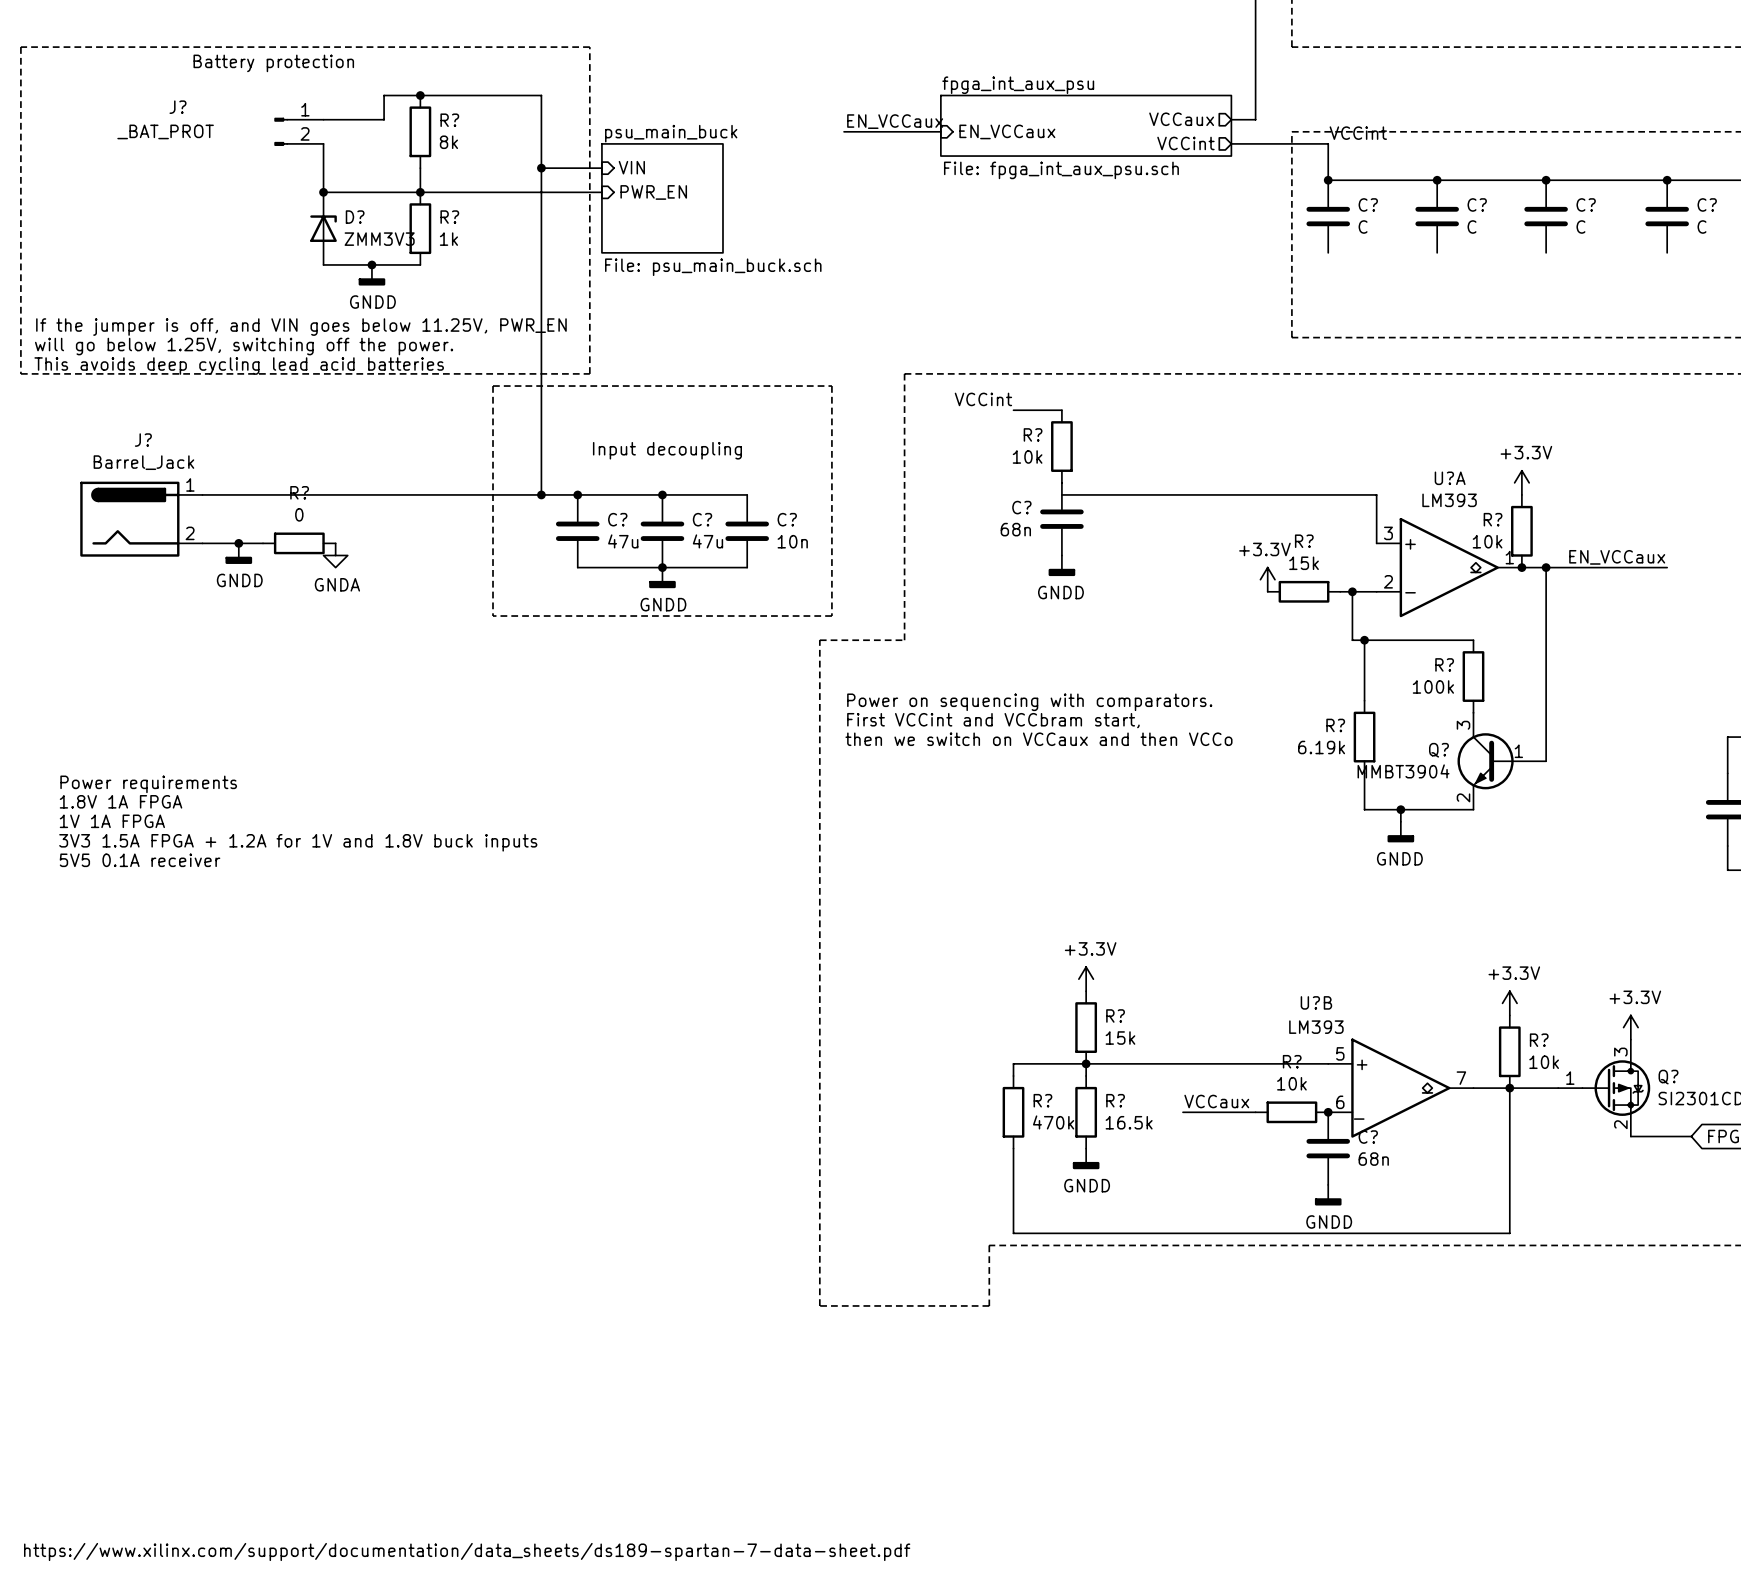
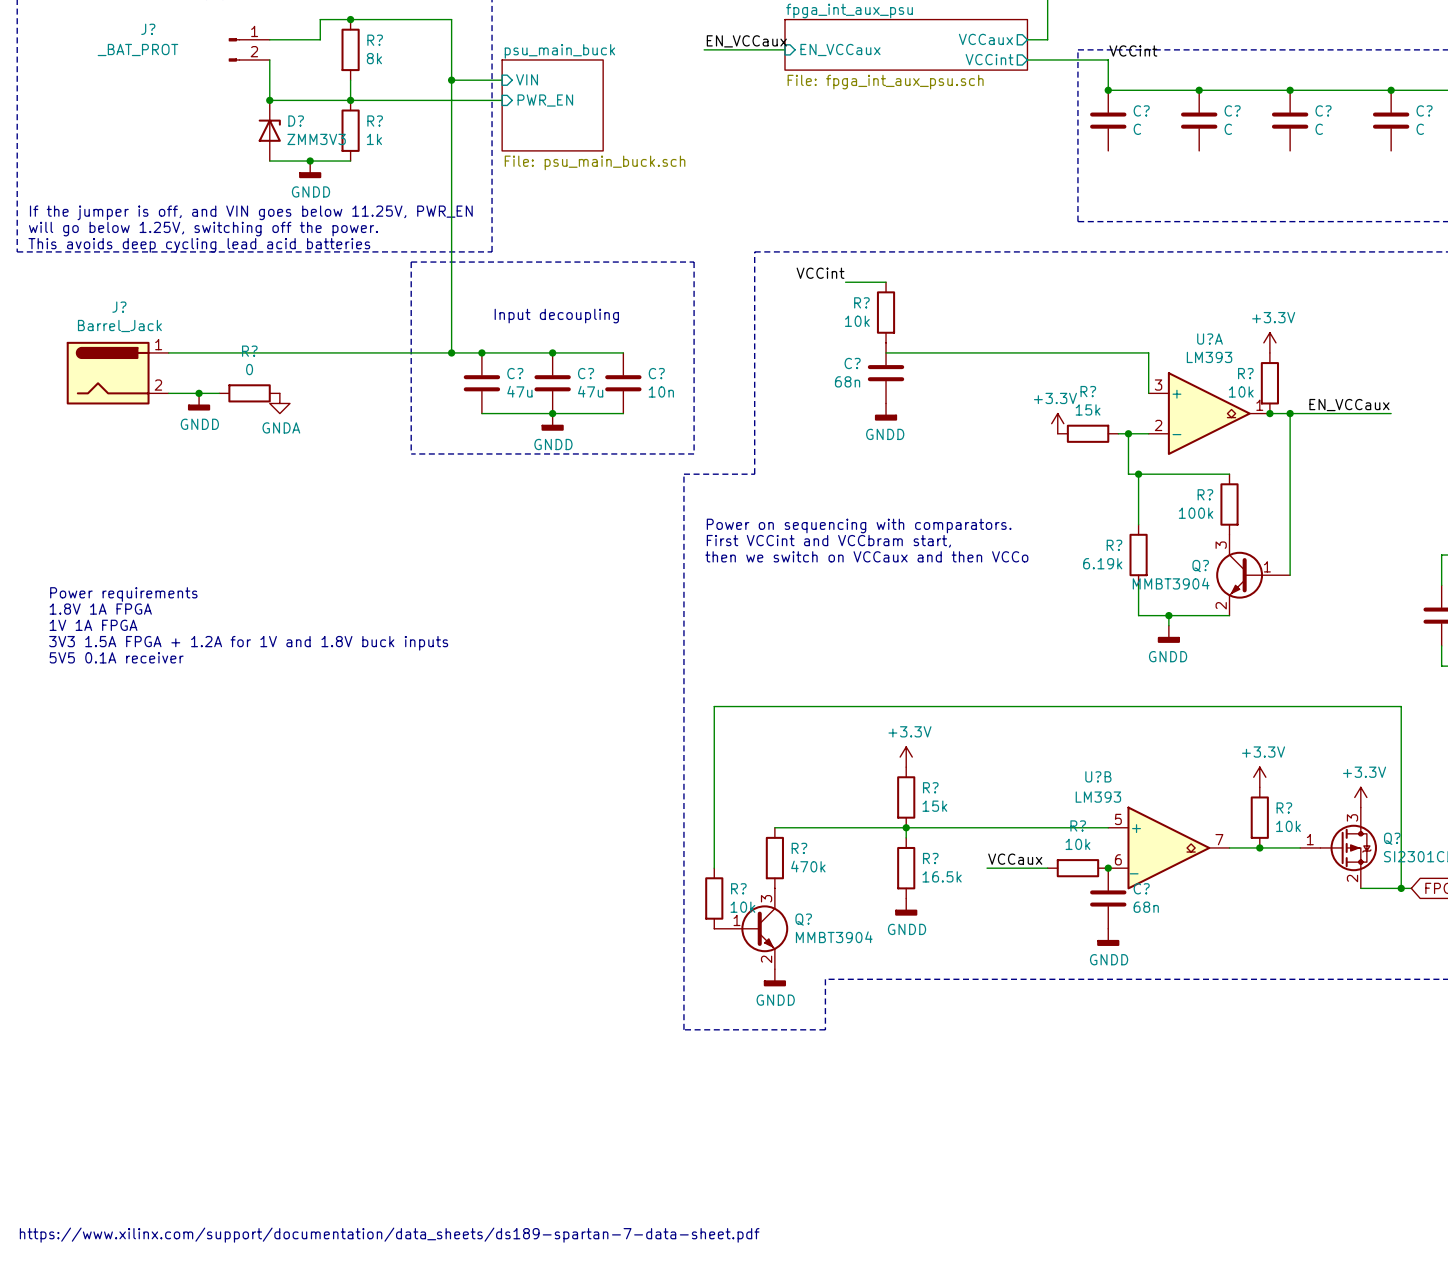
wire: (1013, 1063) (1013, 1075) -> (845, 827) (774, 827)
wire: (1509, 1088) (1509, 1233) (1013, 1233) (1013, 1148) -> none
wire: none -> (714, 868) (714, 706) (1401, 706) (1401, 888)
R? position: (1013, 1112) -> (774, 858)
junction: none -> (1401, 888)
R?: none -> 10k (714, 898)
Q?: none -> MMBT3904 (751, 928)
power symbol: none -> GNDD (774, 977)

